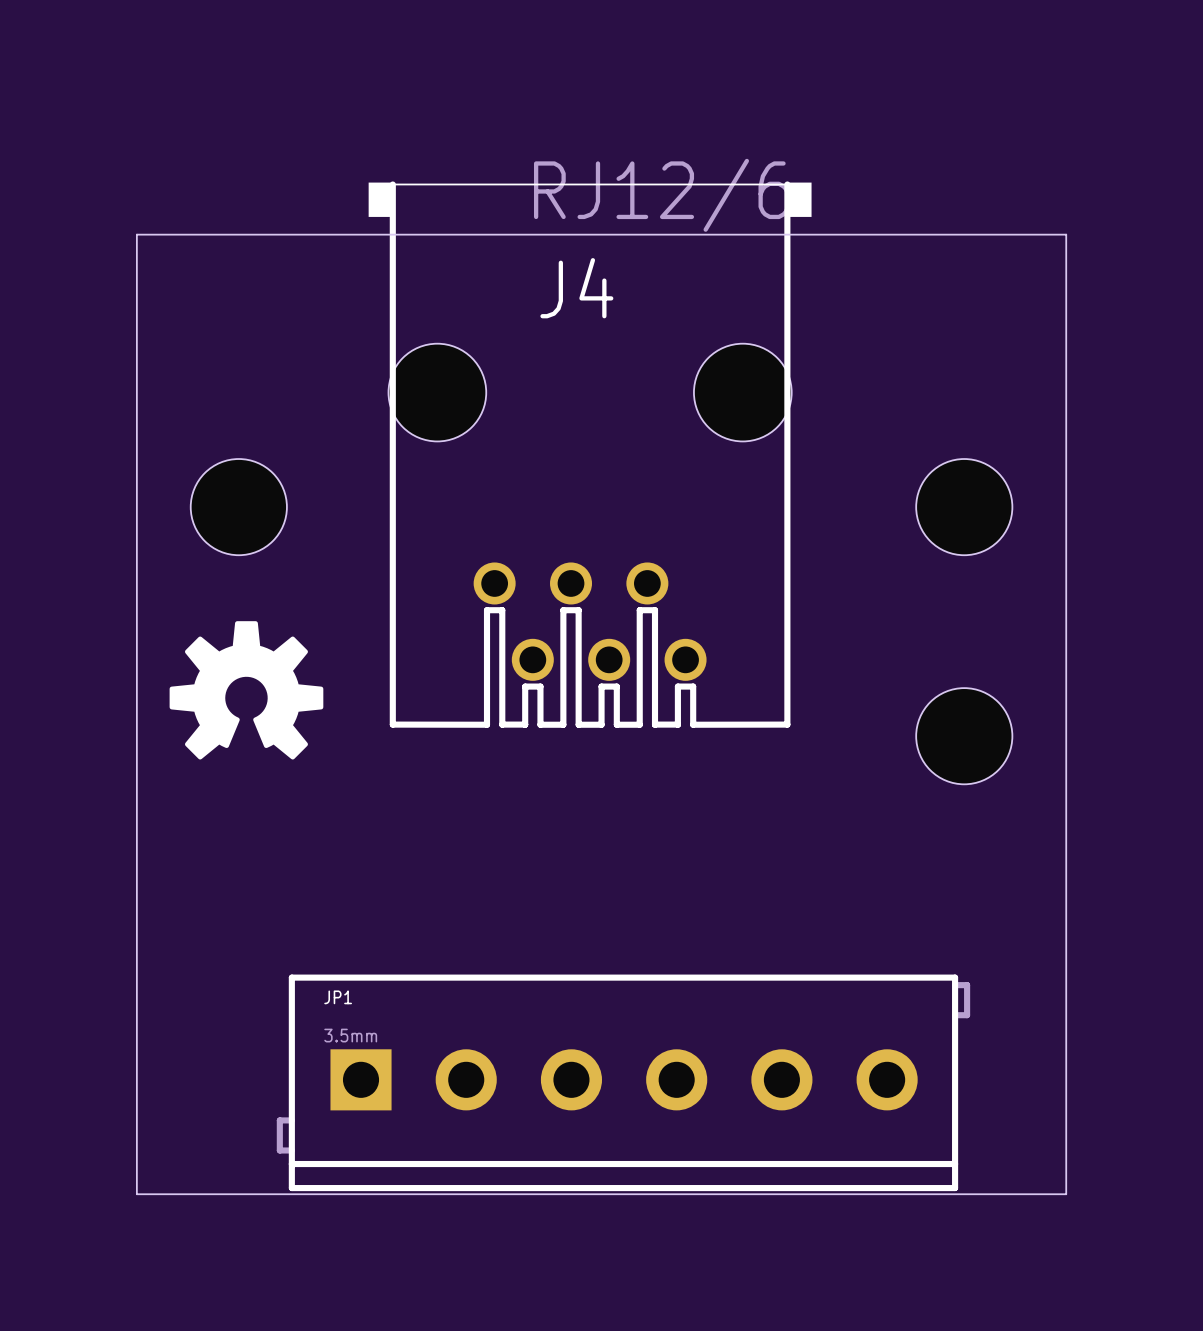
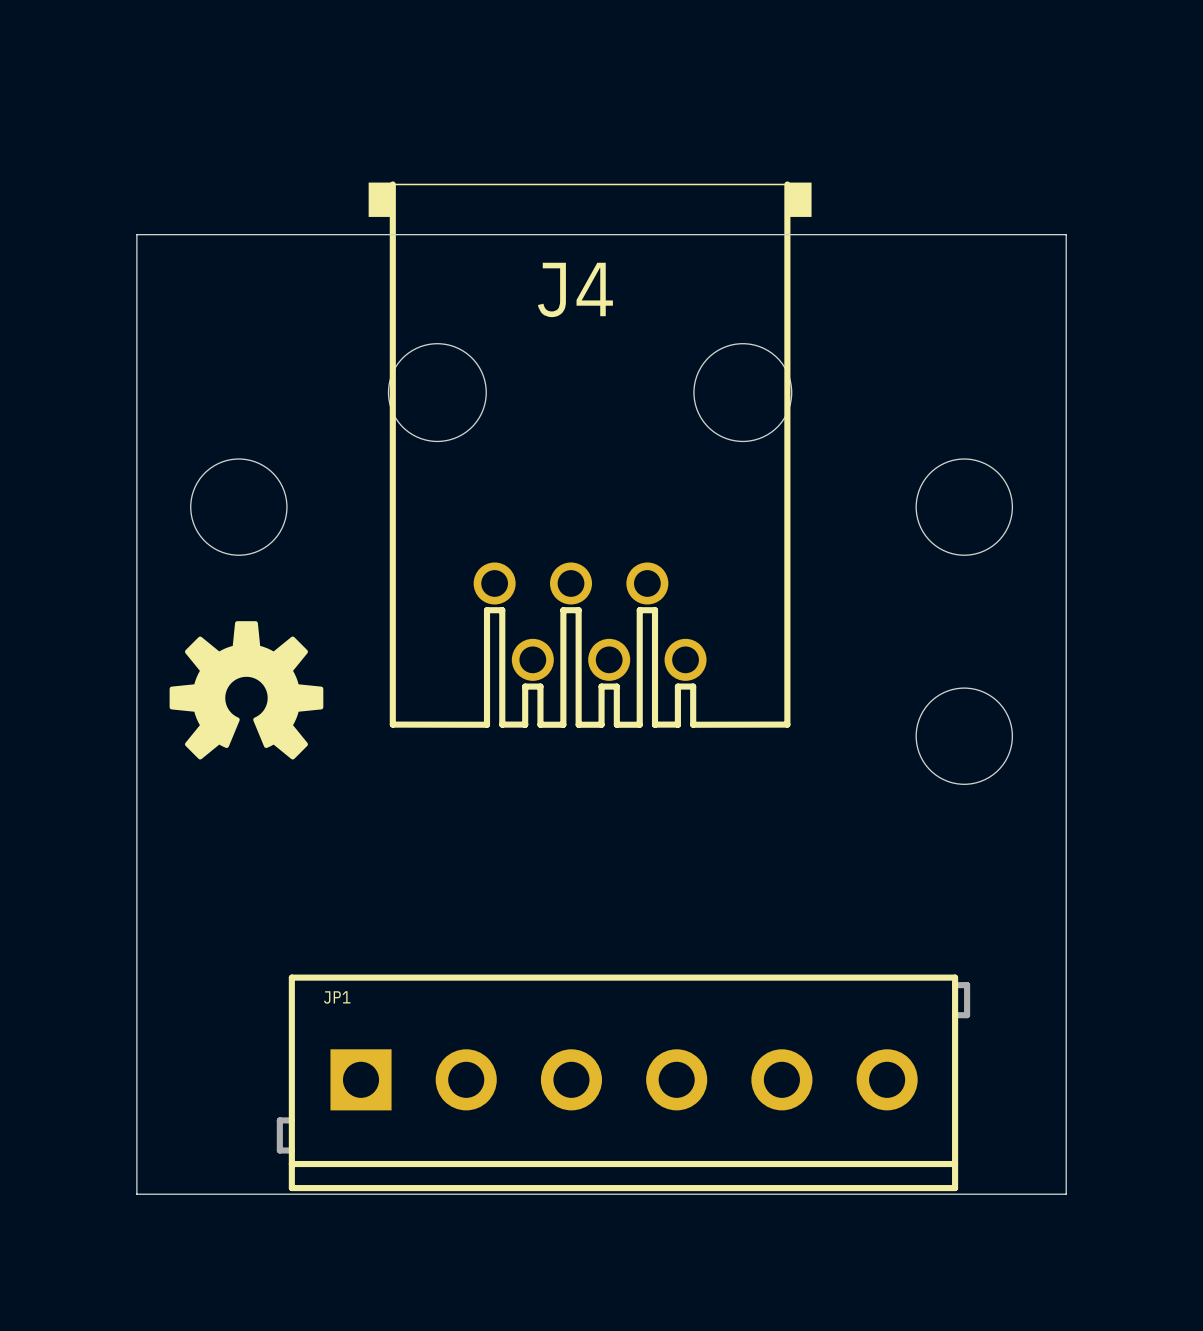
J4 value: RJ12/6 (662, 195) -> none
JP1 value: 3.5mm (350, 1035) -> none

